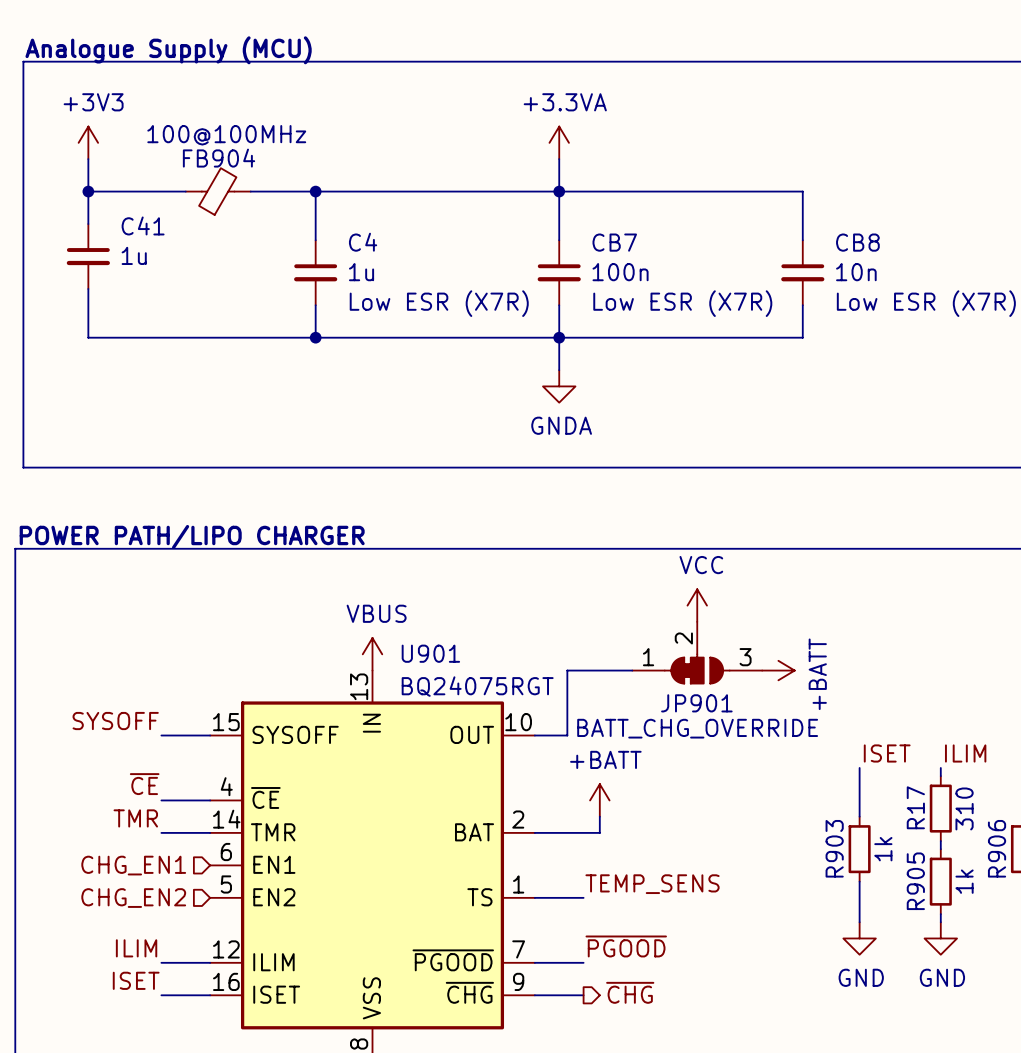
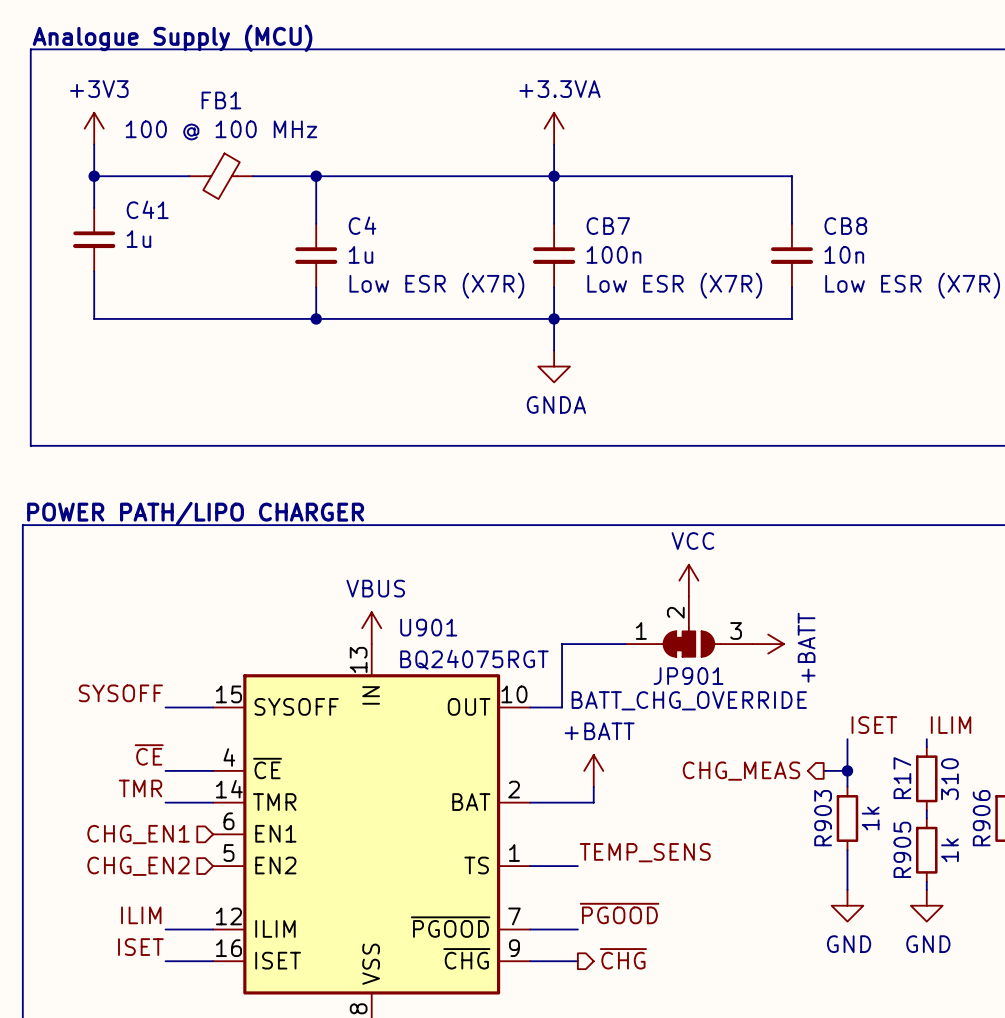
FB904: 100@100MHz (218, 191) -> none
FB1: none -> (221, 176)
hierarchical label: none -> CHG_MEAS (741, 771)
wire: none -> (823, 770) (847, 770)
junction: none -> (847, 770)

